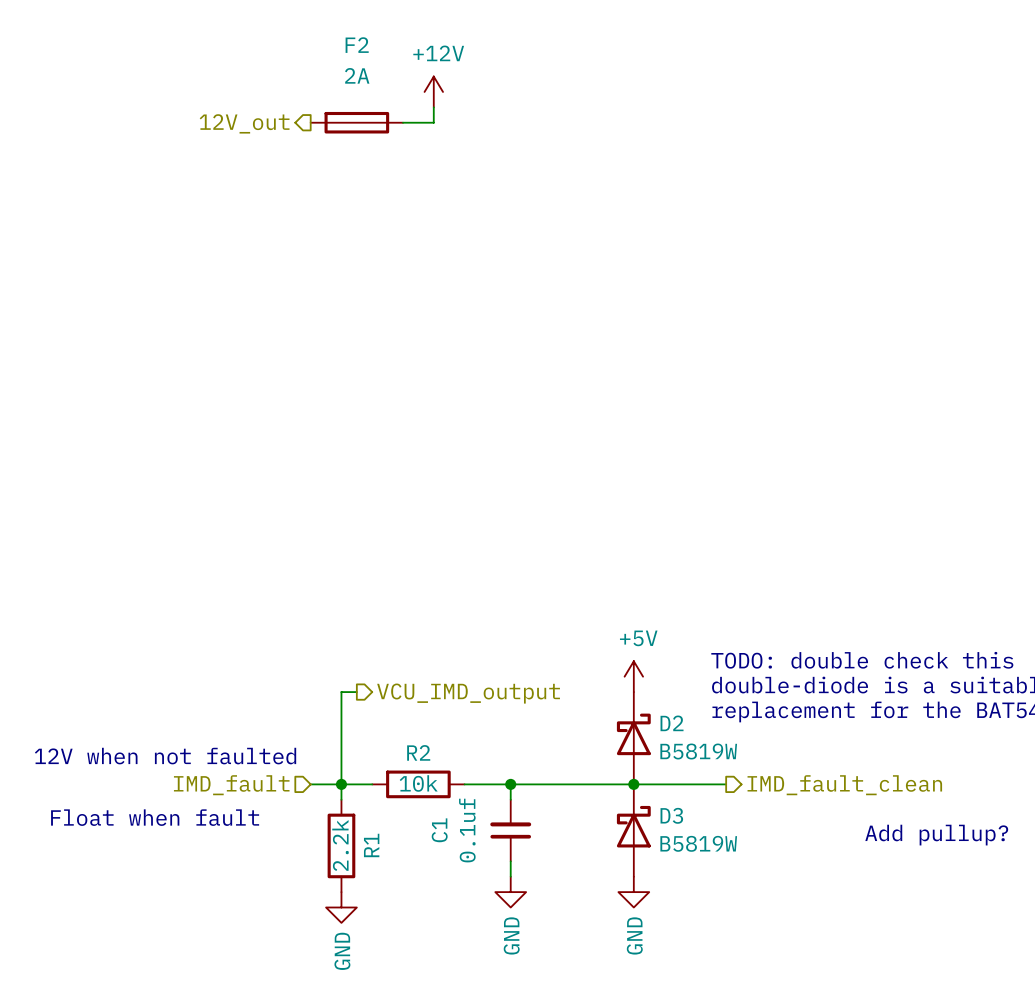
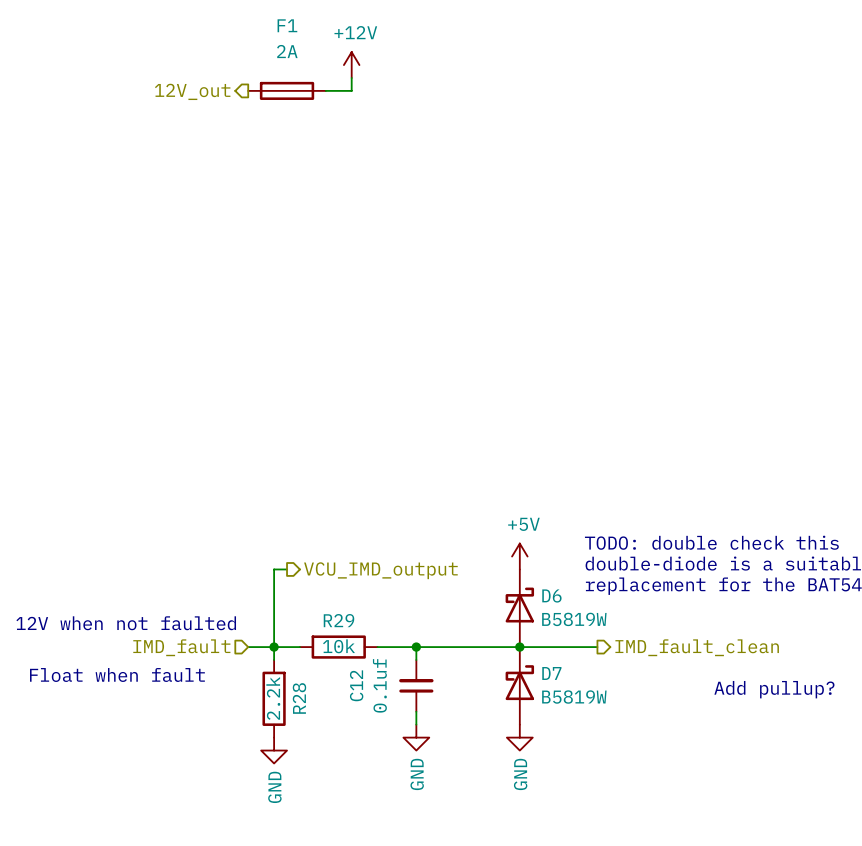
F2 name: F2 (357, 45) -> F1 (287, 25)
D2 name: D2 (672, 723) -> D6 (551, 595)
R2 name: R2 (418, 752) -> R29 (338, 620)
D3 name: D3 (671, 815) -> D7 (551, 673)
C1 name: C1 (439, 830) -> C12 (356, 685)
R1 name: R1 (371, 845) -> R28 (299, 698)

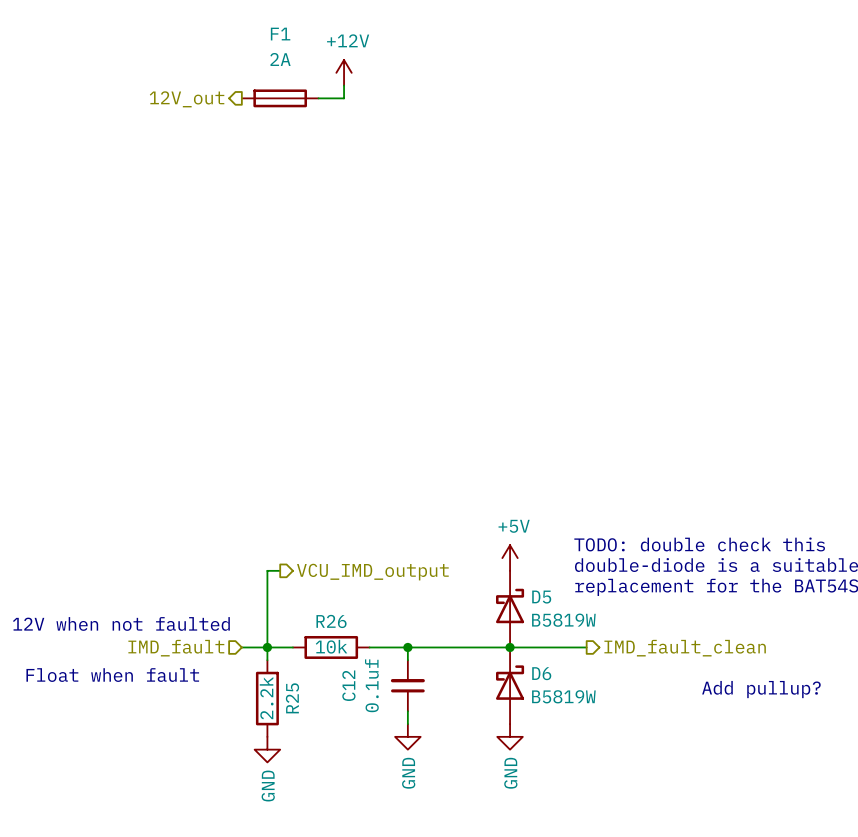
D6 name: D6 (551, 595) -> D5 (541, 597)
R29 name: R29 (338, 620) -> R26 (331, 621)
D7 name: D7 (551, 673) -> D6 (541, 673)
R28 name: R28 (299, 698) -> R25 (292, 698)

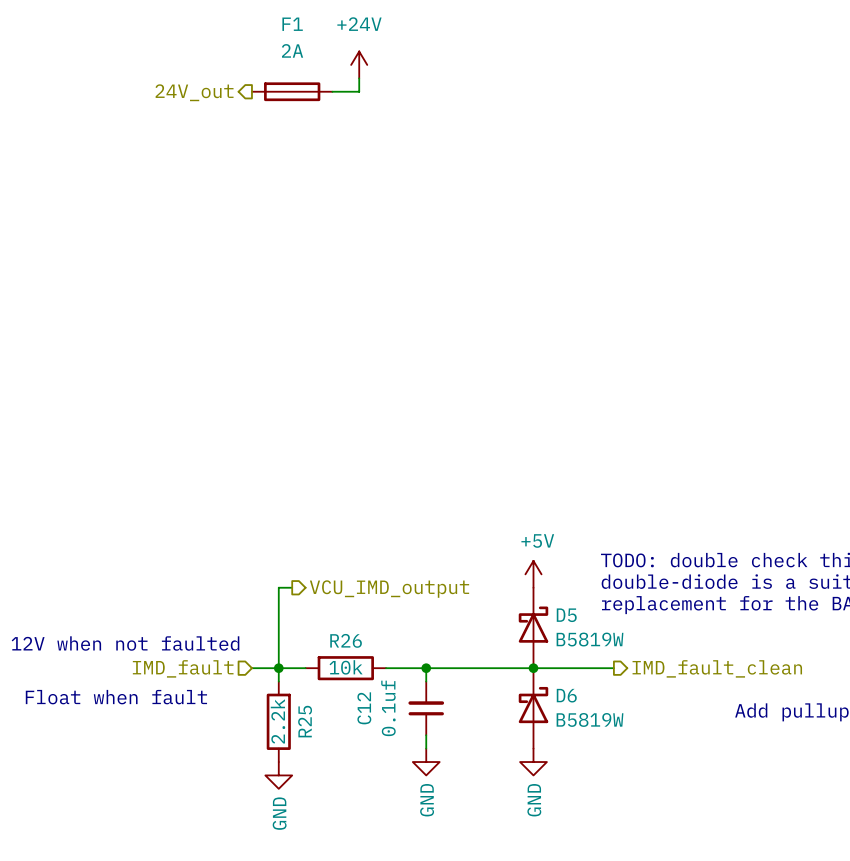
power symbol: +12V (344, 72) -> +24V (359, 64)
hierarchical label: 12V_out (187, 99) -> 24V_out (194, 92)

